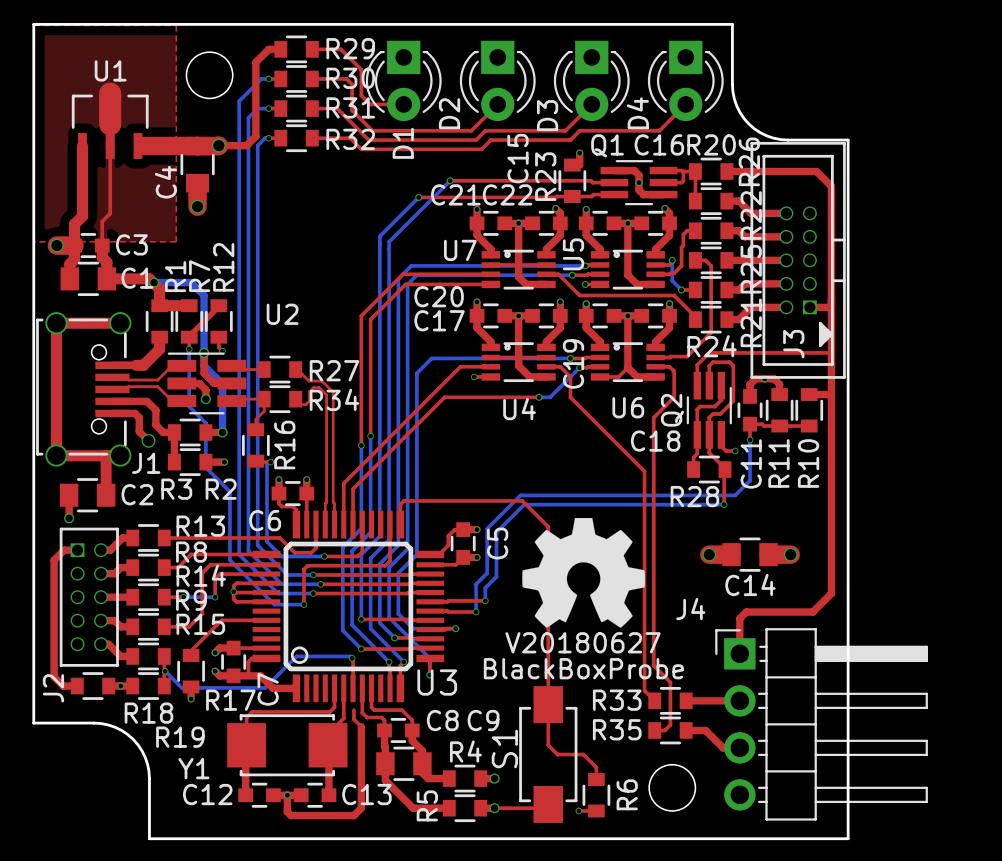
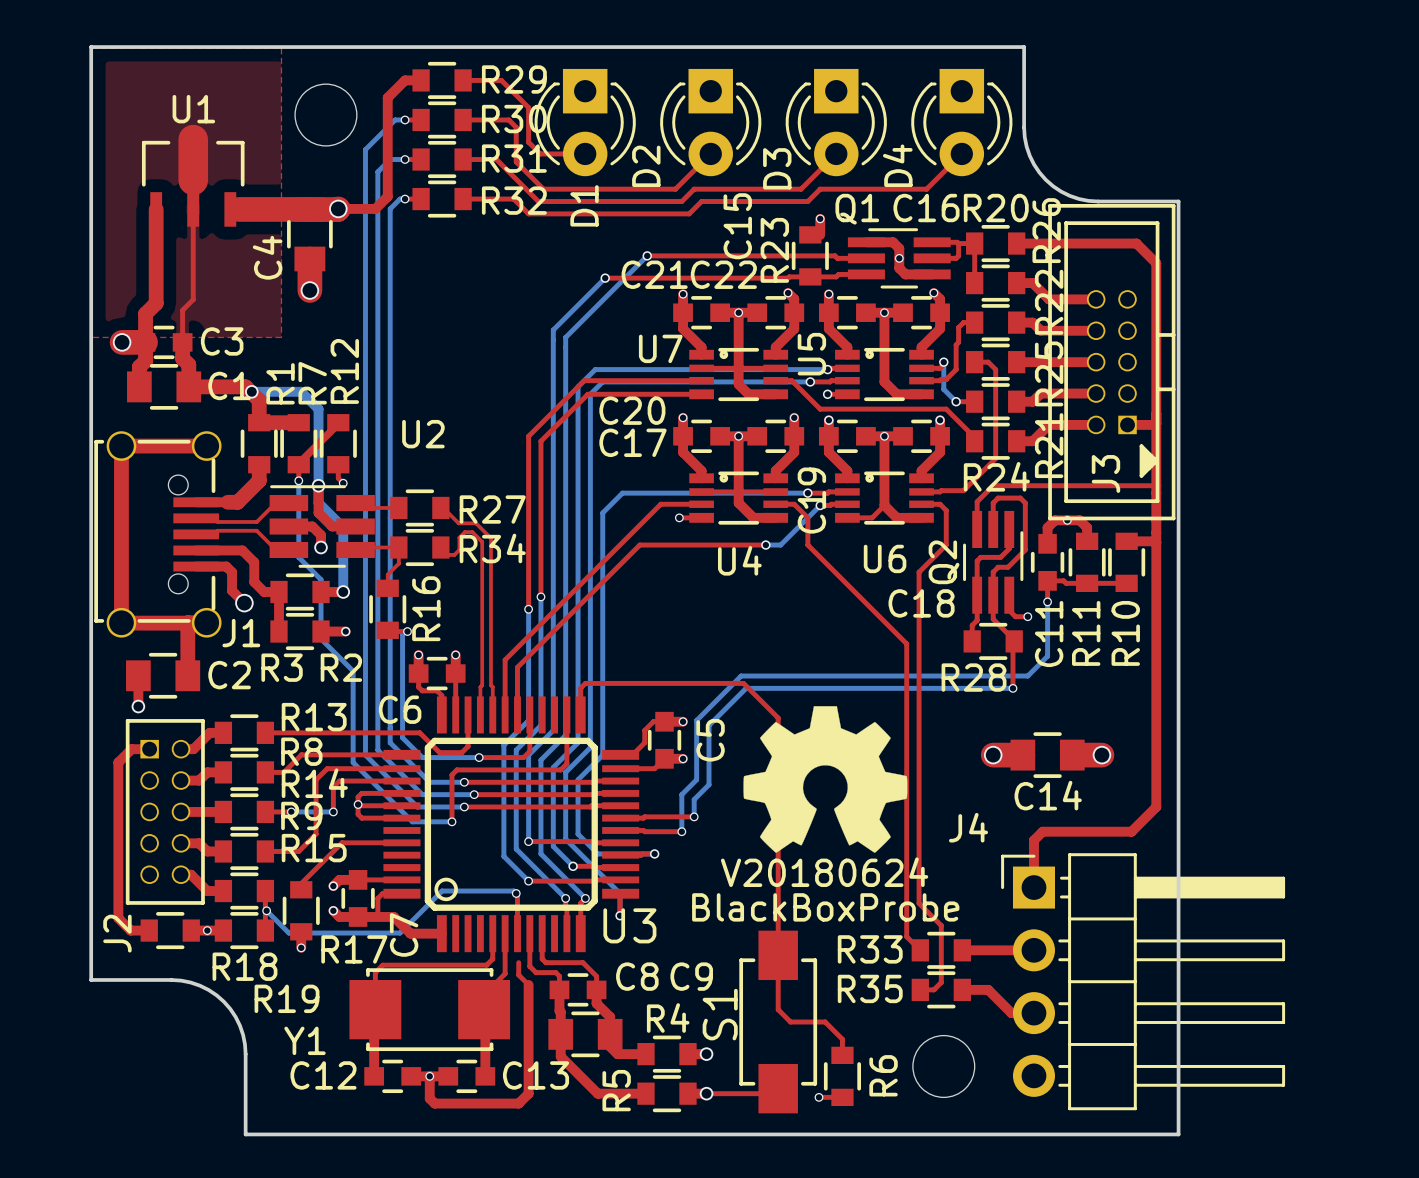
drawing shape: [505, 632, 661, 654] -> [720, 857, 929, 888]

